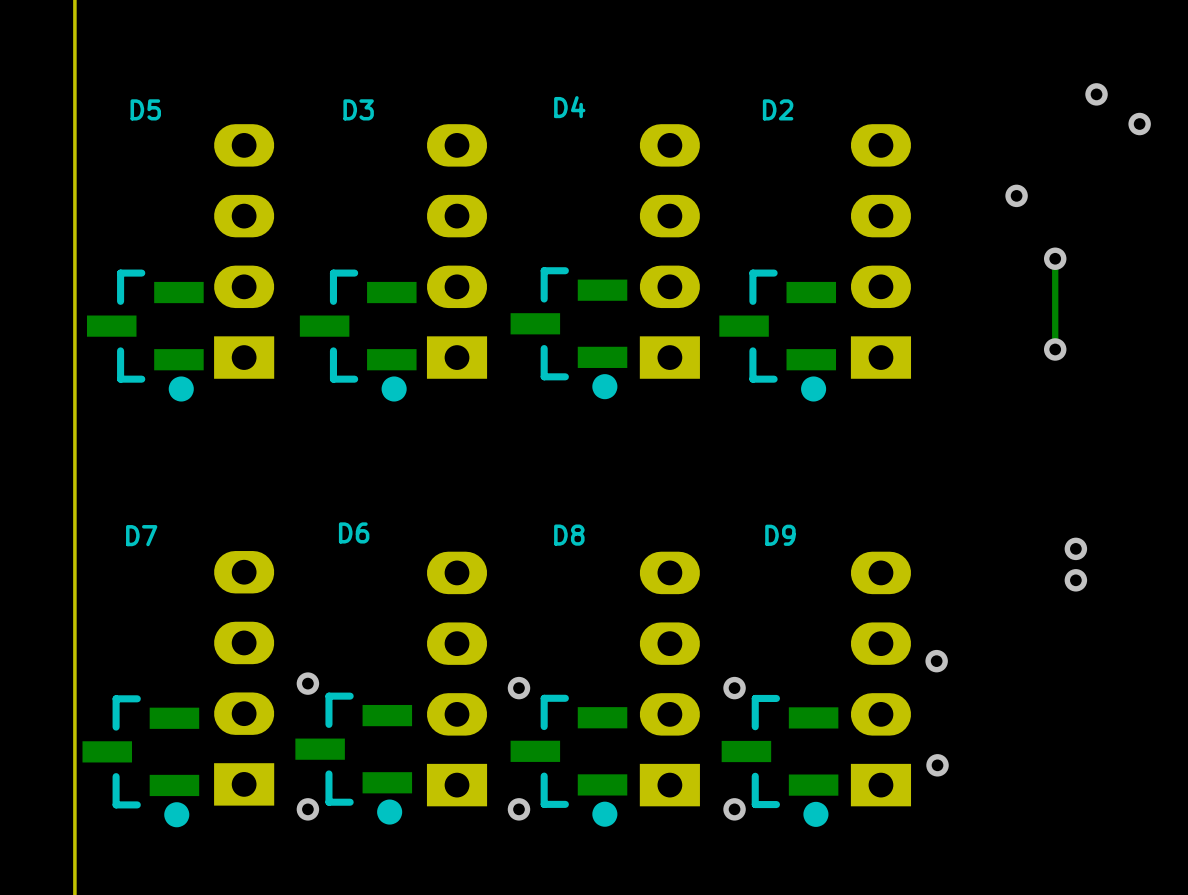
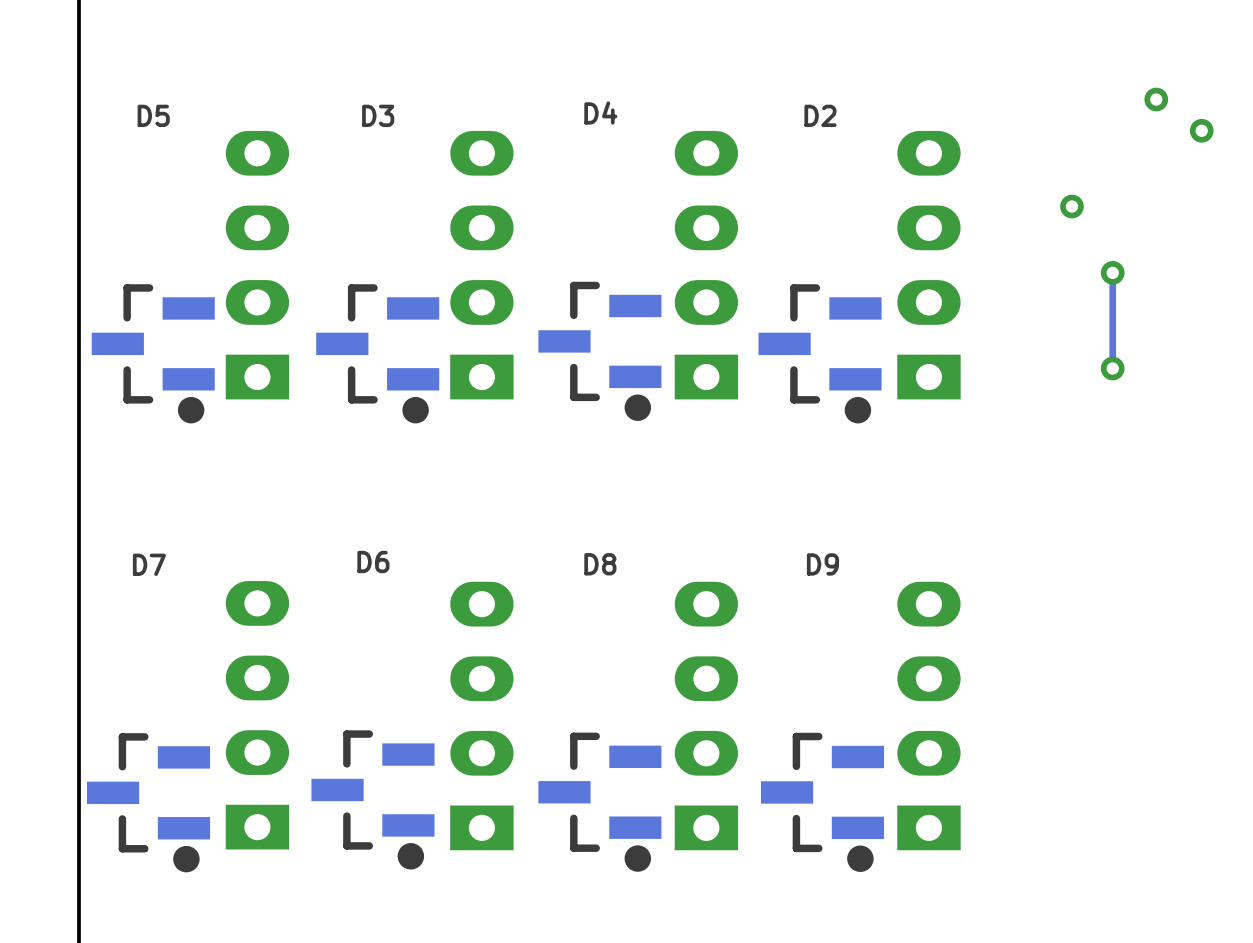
via: (1075, 548) -> none
via: (1075, 580) -> none
via: (936, 661) -> none
via: (307, 683) -> none
via: (518, 688) -> none
via: (734, 688) -> none
via: (937, 765) -> none
via: (307, 809) -> none
via: (518, 809) -> none
via: (734, 809) -> none

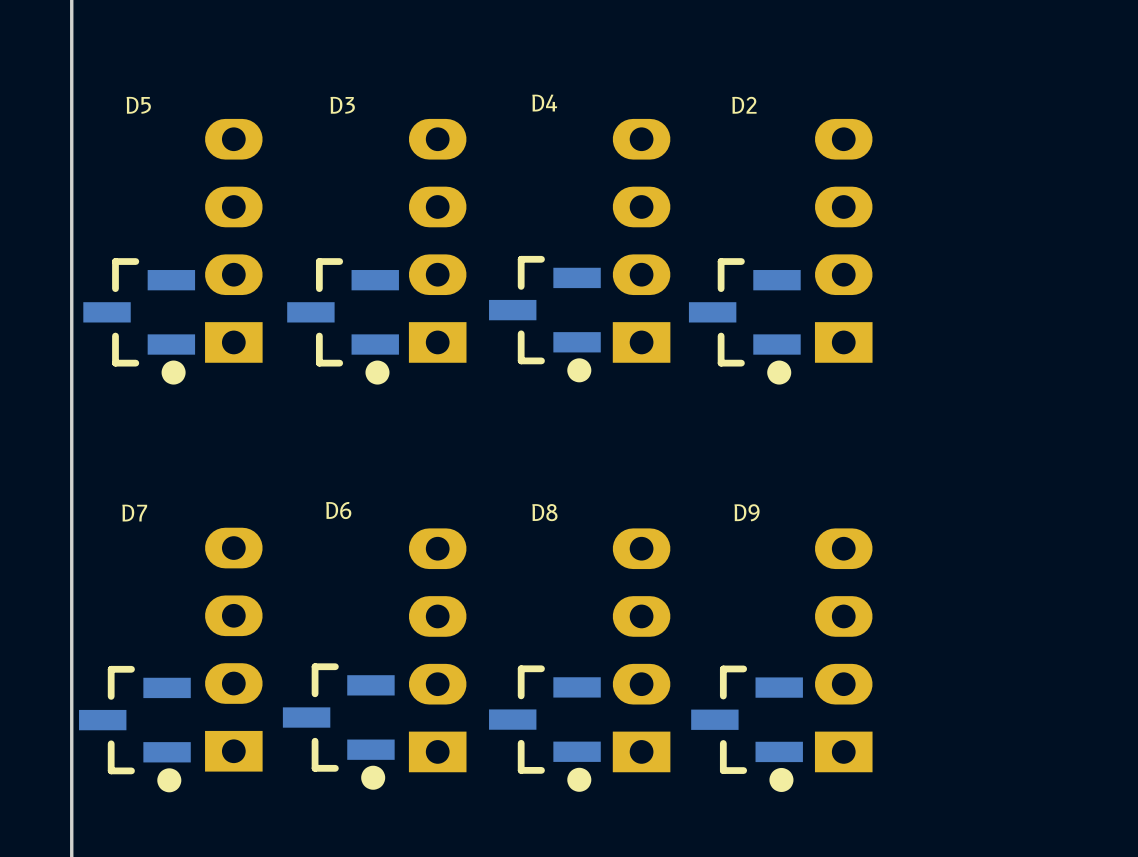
via: (1156, 99) -> none
via: (1201, 130) -> none
via: (1071, 206) -> none
track: (1112, 272) (1112, 368) -> none
via: (1112, 272) -> none
via: (1112, 368) -> none

